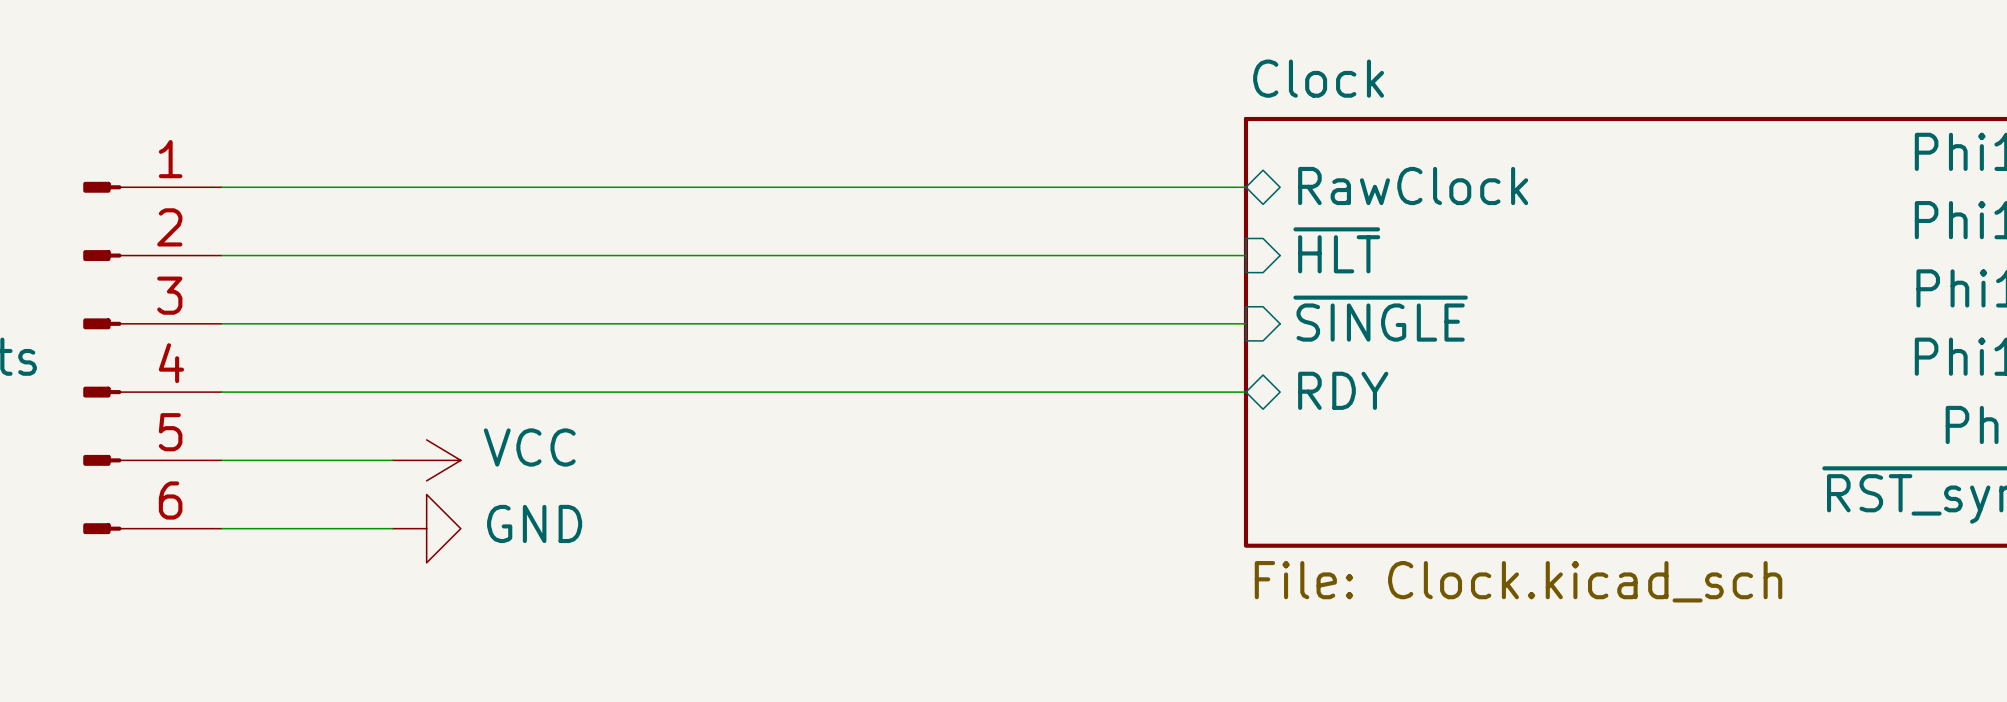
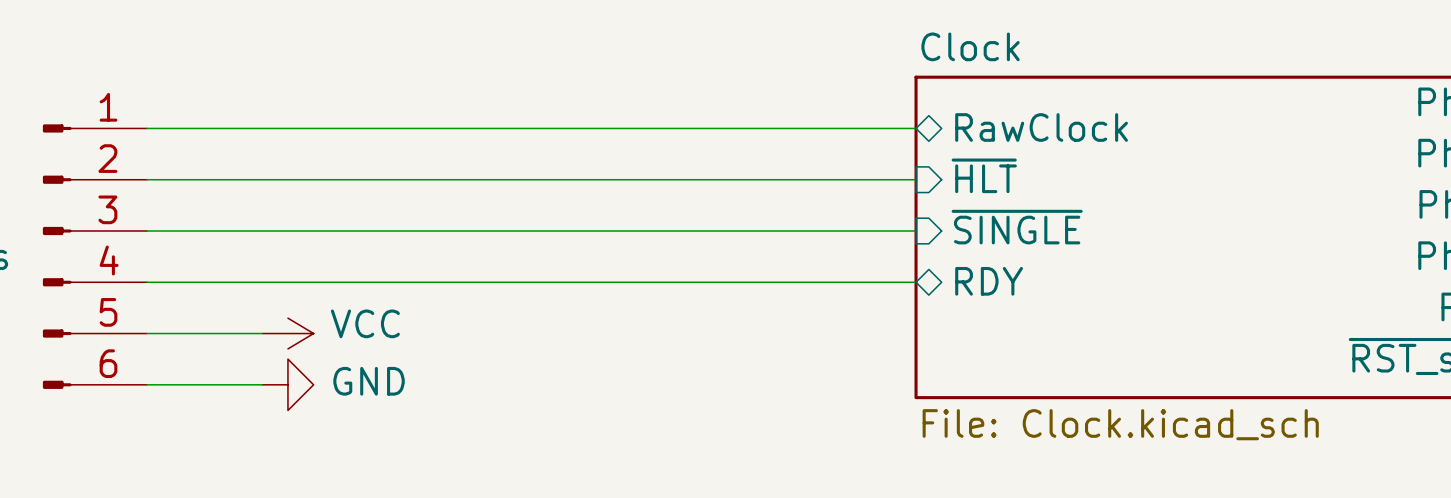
power symbol position: VCC (426, 460) -> VCC (287, 333)
power symbol position: GND (426, 528) -> GND (287, 384)

